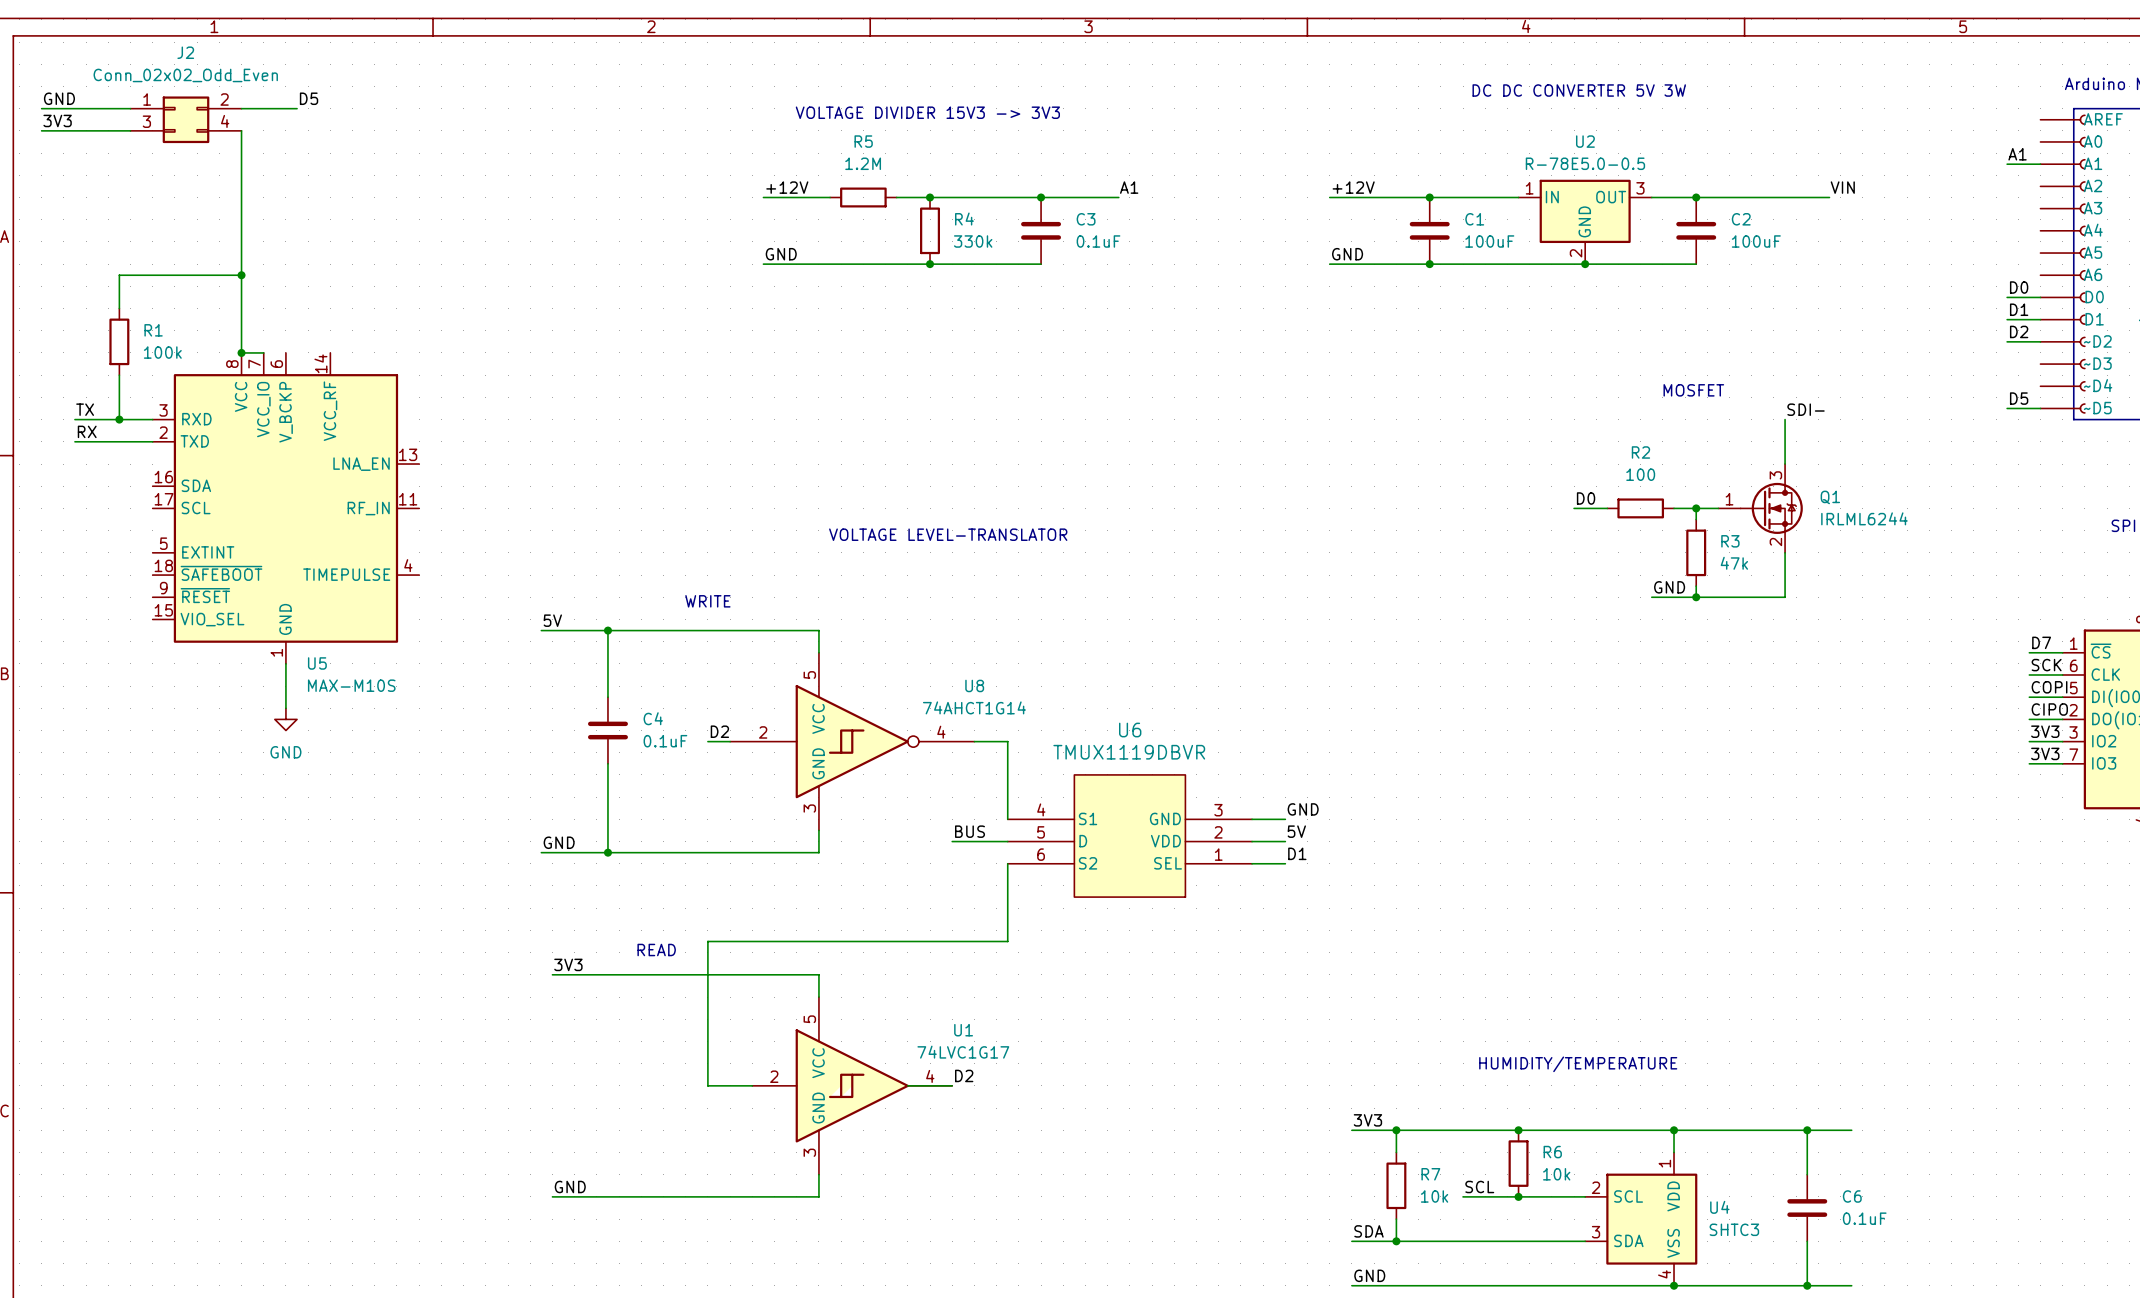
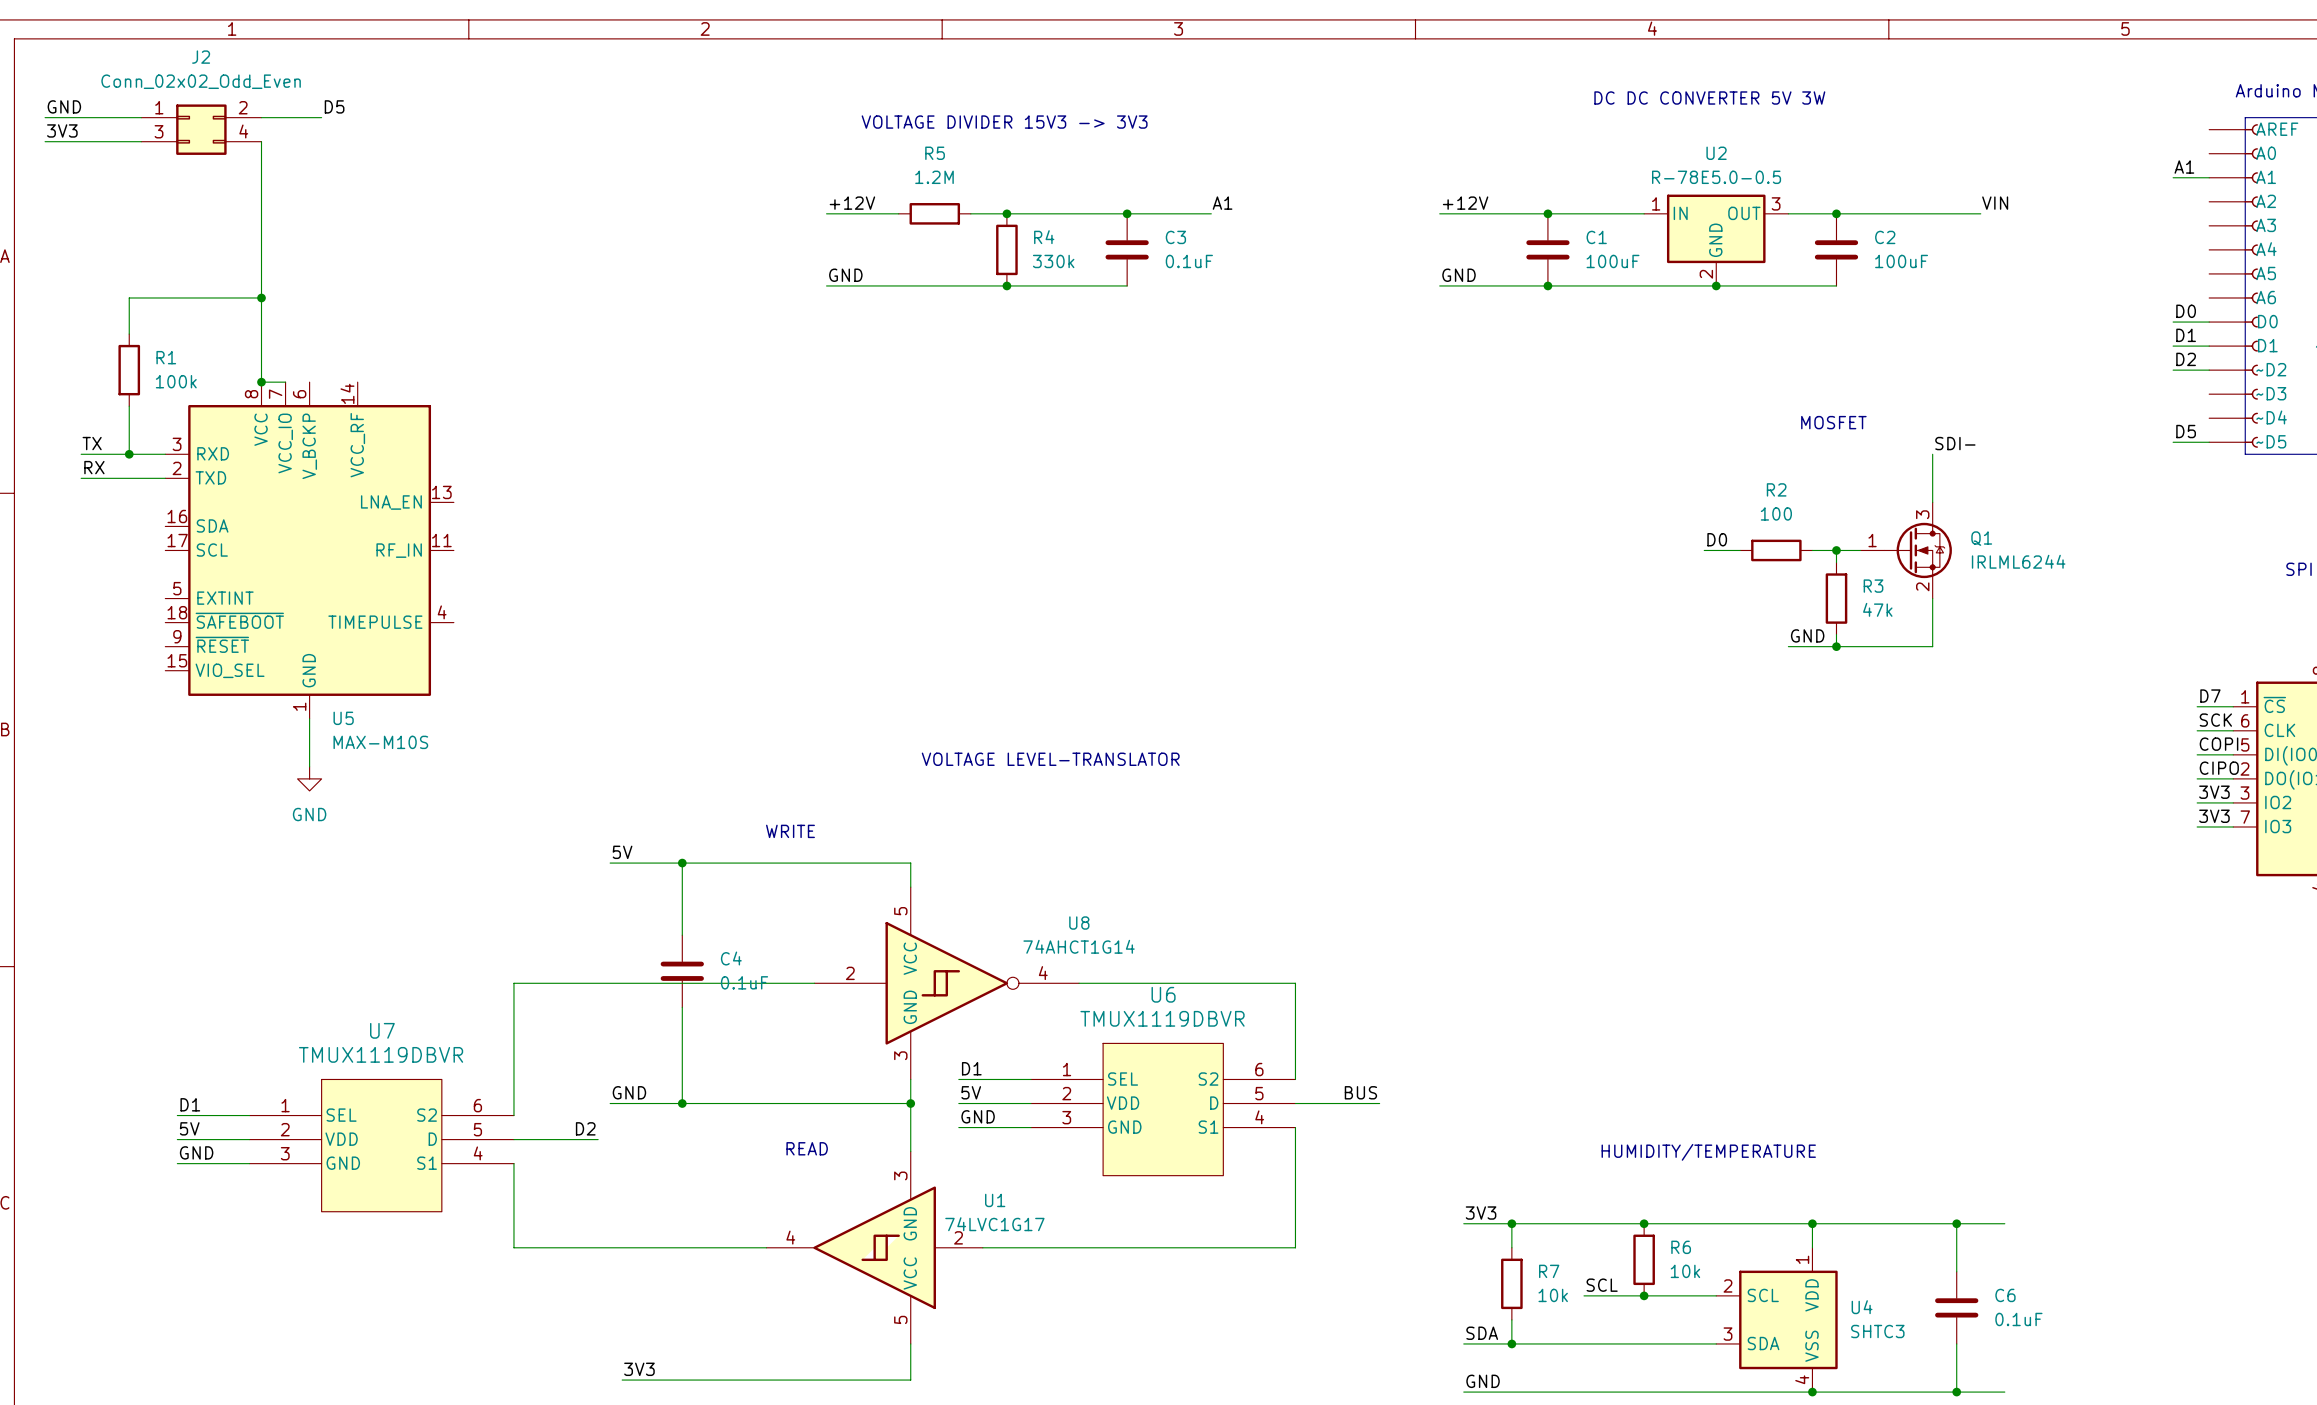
text position: VOLTAGE LEVEL-TRANSLATOR (948, 534) -> VOLTAGE LEVEL-TRANSLATOR (1050, 759)
text position: WRITE (707, 601) -> WRITE (790, 831)
label position: 5V (552, 620) -> 5V (622, 852)
wire: (541, 630) (818, 630) (818, 652) -> (610, 863) (910, 863) (910, 887)
wire: (607, 630) (607, 697) -> (682, 863) (682, 935)
junction: (607, 630) -> none
C4 position: (607, 730) -> (682, 971)
label: D2 (719, 731) -> none
wire: (707, 741) (730, 741) -> none
U8 position: (852, 741) -> (946, 983)
wire: (974, 741) (1007, 741) (1007, 819) -> none
wire: (607, 763) (607, 852) -> (682, 1007) (682, 1103)
junction: none -> (682, 863)
label: GND (1303, 809) -> none
wire: (1252, 819) (1285, 819) -> none
wire: (818, 830) (818, 852) (541, 852) -> none
label: BUS (970, 831) -> none
label: 5V (1296, 831) -> none
U6 rotation: 0° (1129, 836) -> 180° (1163, 1109)
U6 position: (1129, 836) -> (1163, 1109)
wire: (952, 841) (1007, 841) -> none
wire: (1252, 841) (1285, 841) -> none
label: GND (559, 842) -> none
junction: (607, 852) -> none
label: D1 (1297, 853) -> none
wire: (1007, 863) (1007, 941) (707, 941) (707, 1085) (752, 1085) -> none
wire: (1252, 863) (1285, 863) -> none
wire: none -> (814, 983) (513, 983) (513, 1115)
wire: none -> (1079, 983) (1295, 983) (1295, 1079)
text position: READ (656, 950) -> READ (807, 1148)
label: 3V3 (568, 964) -> none
wire: (552, 974) (818, 974) (818, 997) -> none
label: none -> D1 (971, 1068)
wire: none -> (910, 1079) (910, 1151)
wire: none -> (958, 1079) (1030, 1079)
label: none -> GND (629, 1092)
label: none -> 5V (971, 1092)
label: none -> BUS (1360, 1092)
wire: none -> (610, 1103) (910, 1103)
junction: none -> (682, 1103)
junction: none -> (910, 1103)
wire: none -> (958, 1103) (1030, 1103)
wire: none -> (1295, 1103) (1379, 1103)
label: none -> D1 (190, 1104)
wire: none -> (177, 1115) (249, 1115)
label: none -> GND (978, 1116)
wire: none -> (958, 1127) (1030, 1127)
wire: none -> (1295, 1127) (1295, 1247) (982, 1247)
label: none -> 5V (189, 1128)
label: none -> D2 (585, 1128)
wire: none -> (177, 1139) (249, 1139)
wire: none -> (513, 1139) (598, 1139)
U7: none -> TMUX1119DBVR (381, 1145)
label: none -> GND (196, 1152)
wire: none -> (177, 1163) (249, 1163)
wire: none -> (513, 1163) (513, 1247) (766, 1247)
label: D2 (964, 1075) -> none
U1 rotation: 0° (852, 1085) -> 180° (874, 1247)
wire: (907, 1085) (952, 1085) -> none
wire: (818, 1174) (818, 1196) (552, 1196) -> none
label: GND (570, 1186) -> none
wire: none -> (910, 1343) (910, 1380) (622, 1380)
label: none -> 3V3 (639, 1369)

